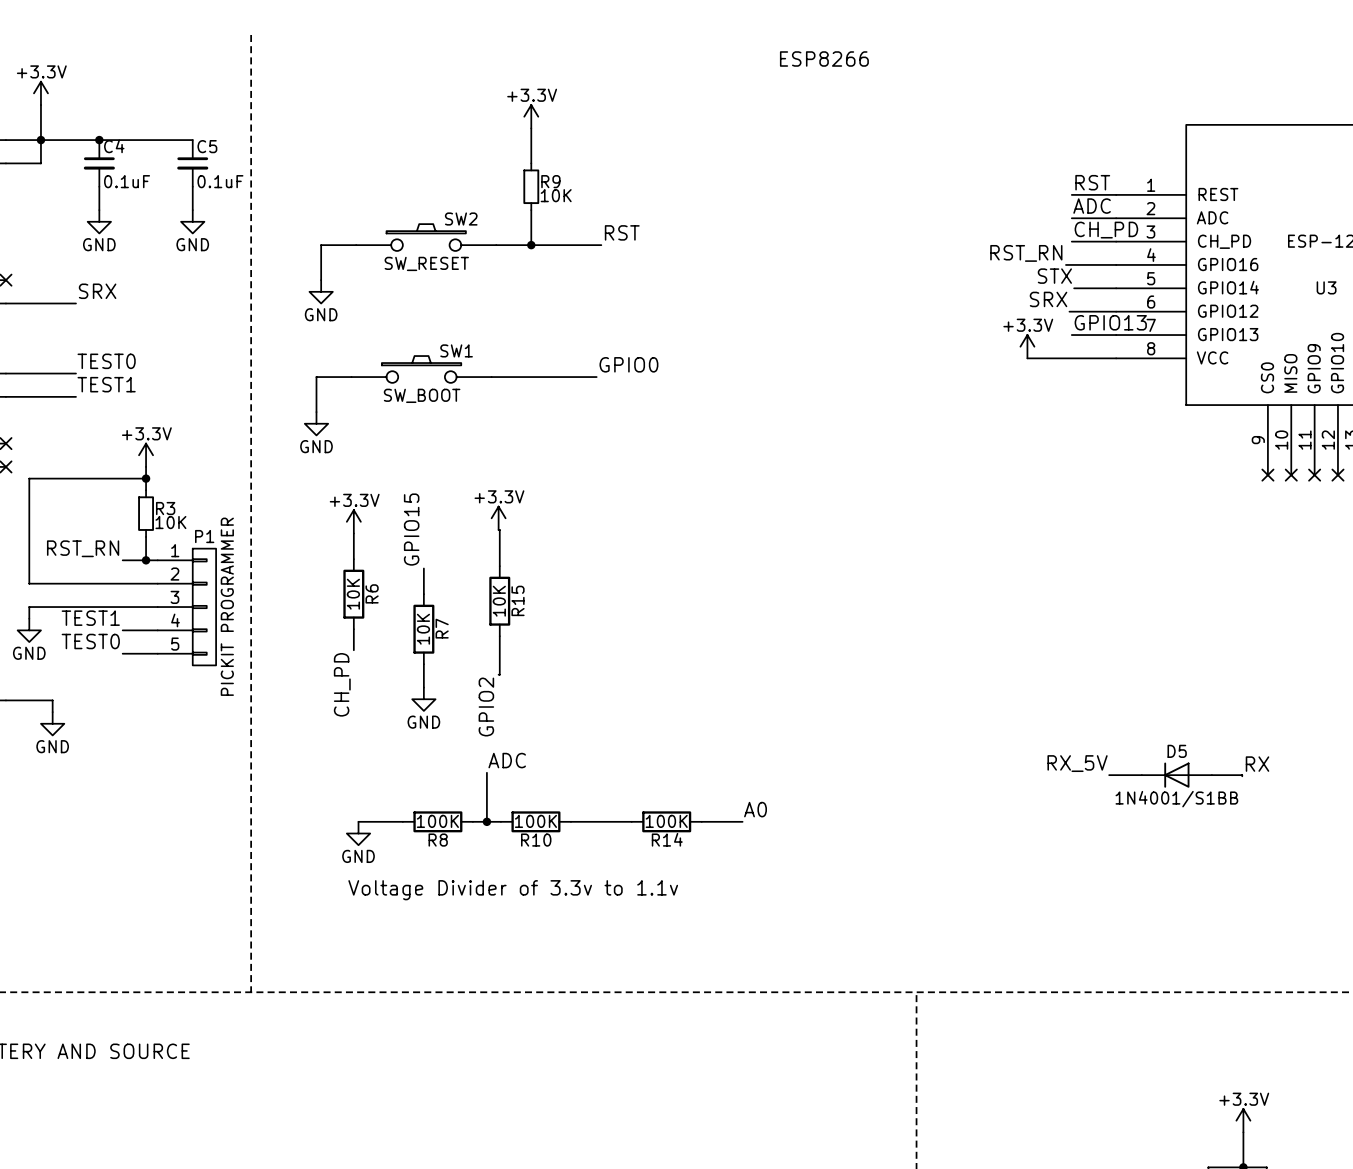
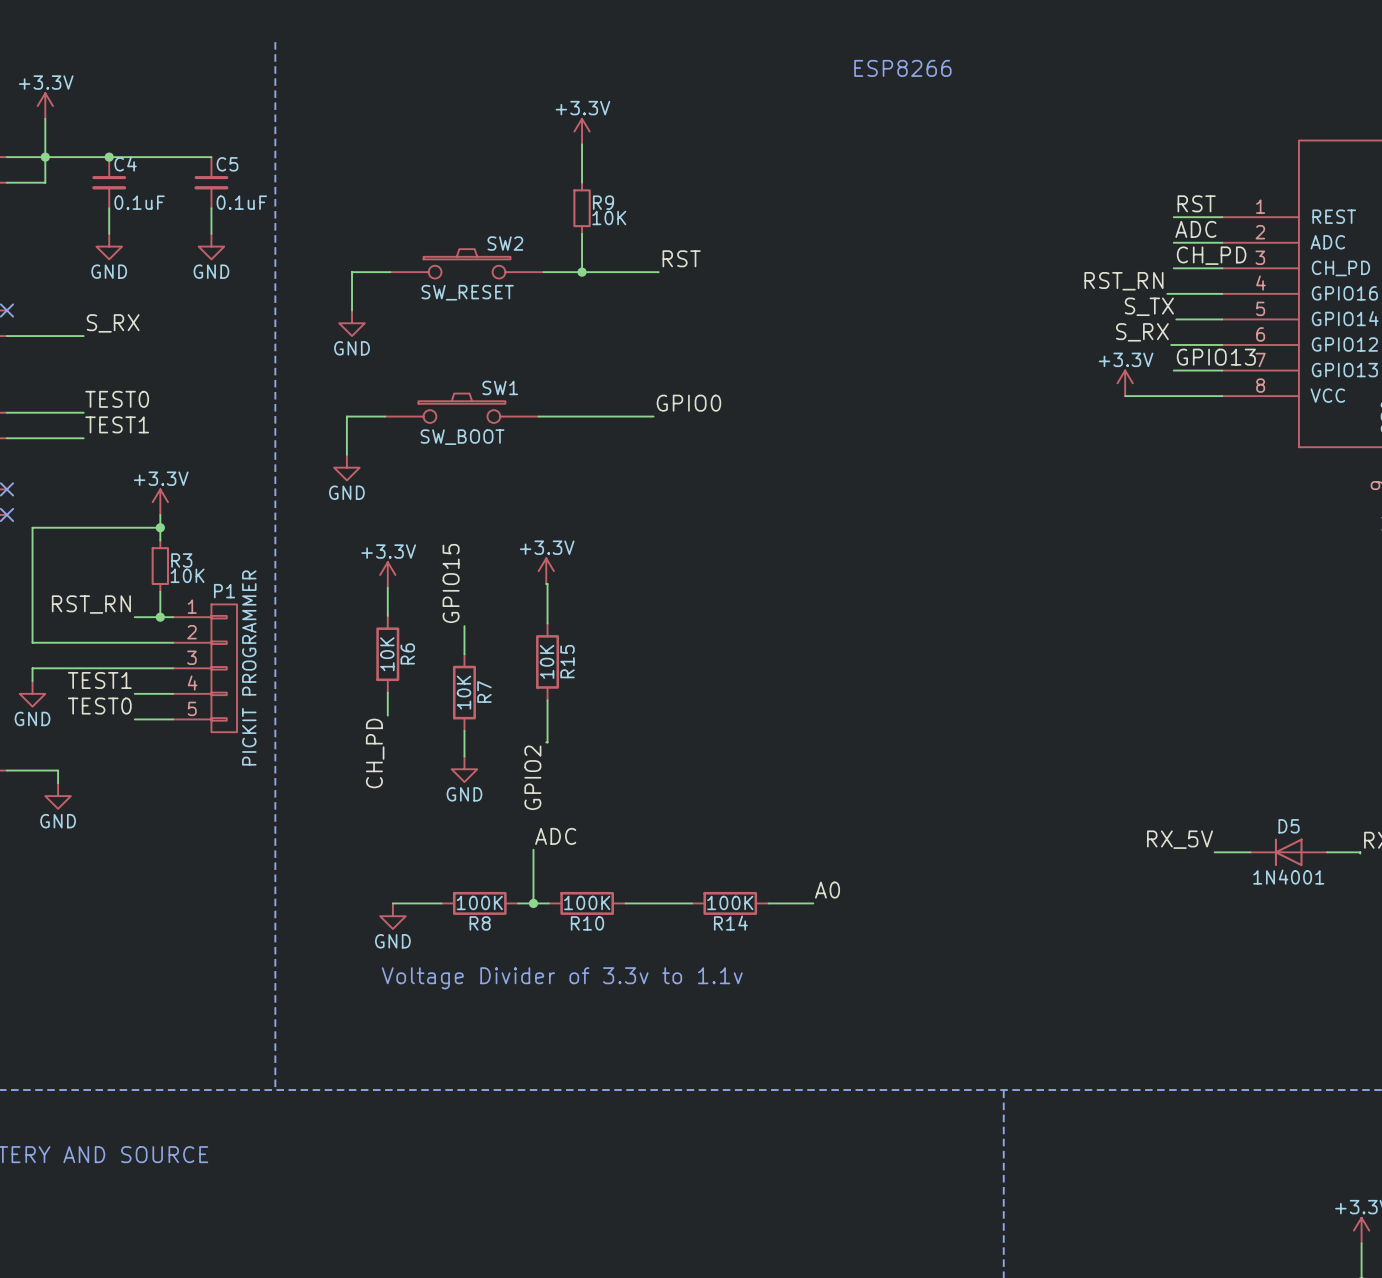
label: STX (1054, 276) -> S_TX (1149, 306)
label: SRX (97, 291) -> S_RX (113, 323)
label: SRX (1048, 299) -> S_RX (1142, 332)
D5 value: 1N4001/S1BB (1176, 799) -> 1N4001 (1288, 877)

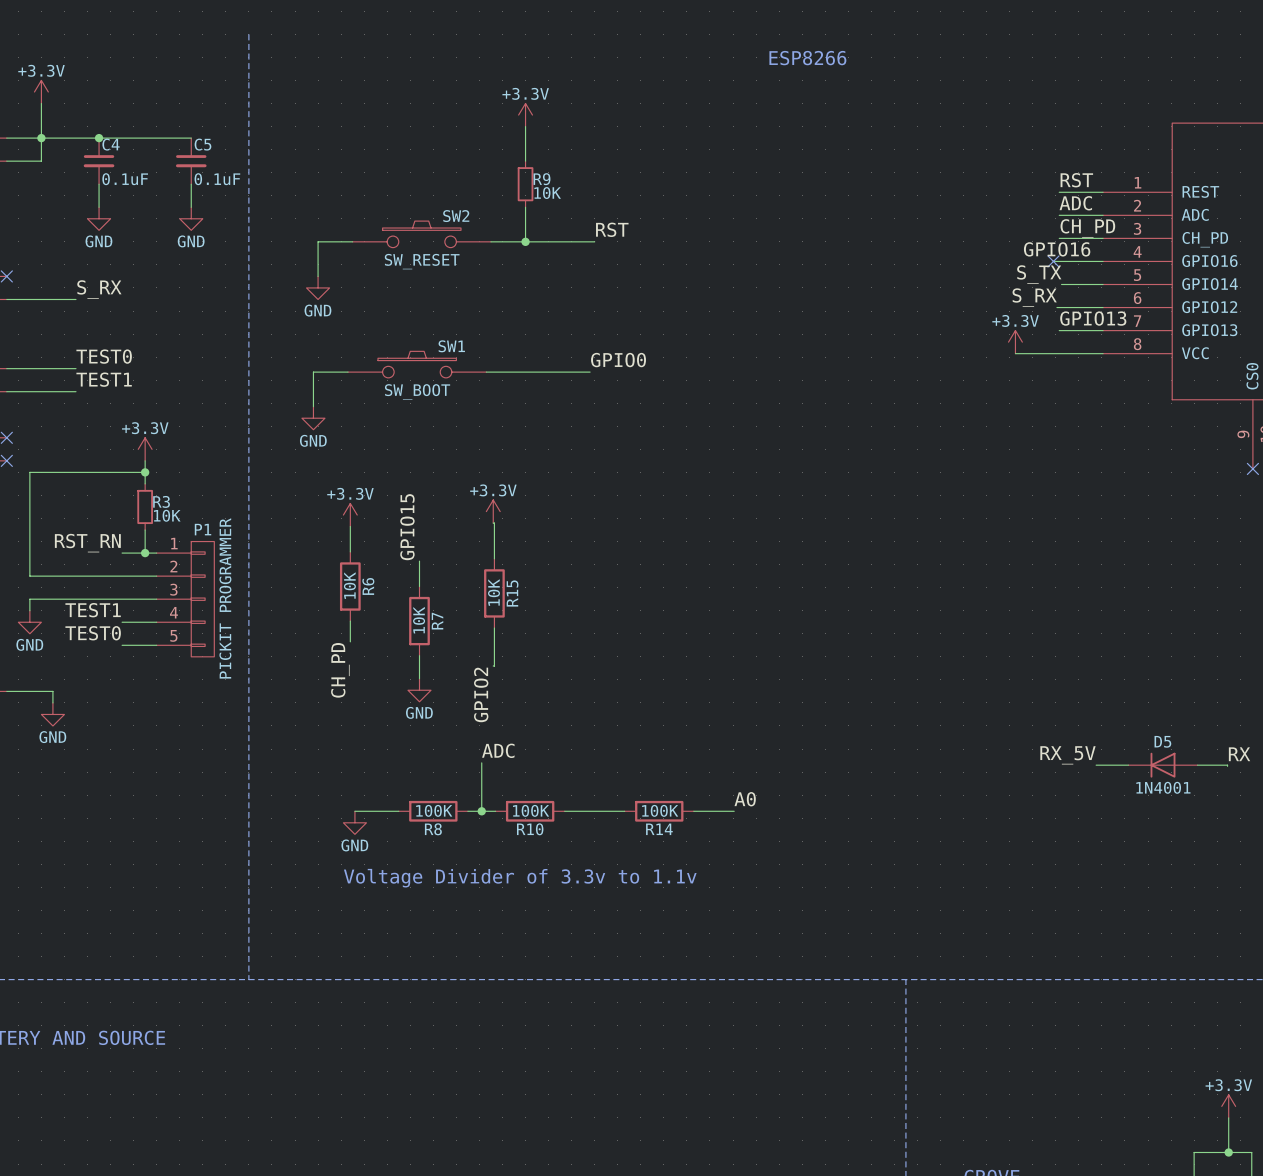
label: none -> GPIO16 (1057, 249)
label: RST_RN (1123, 281) -> none
no-connect mark: none -> (1053, 261)

